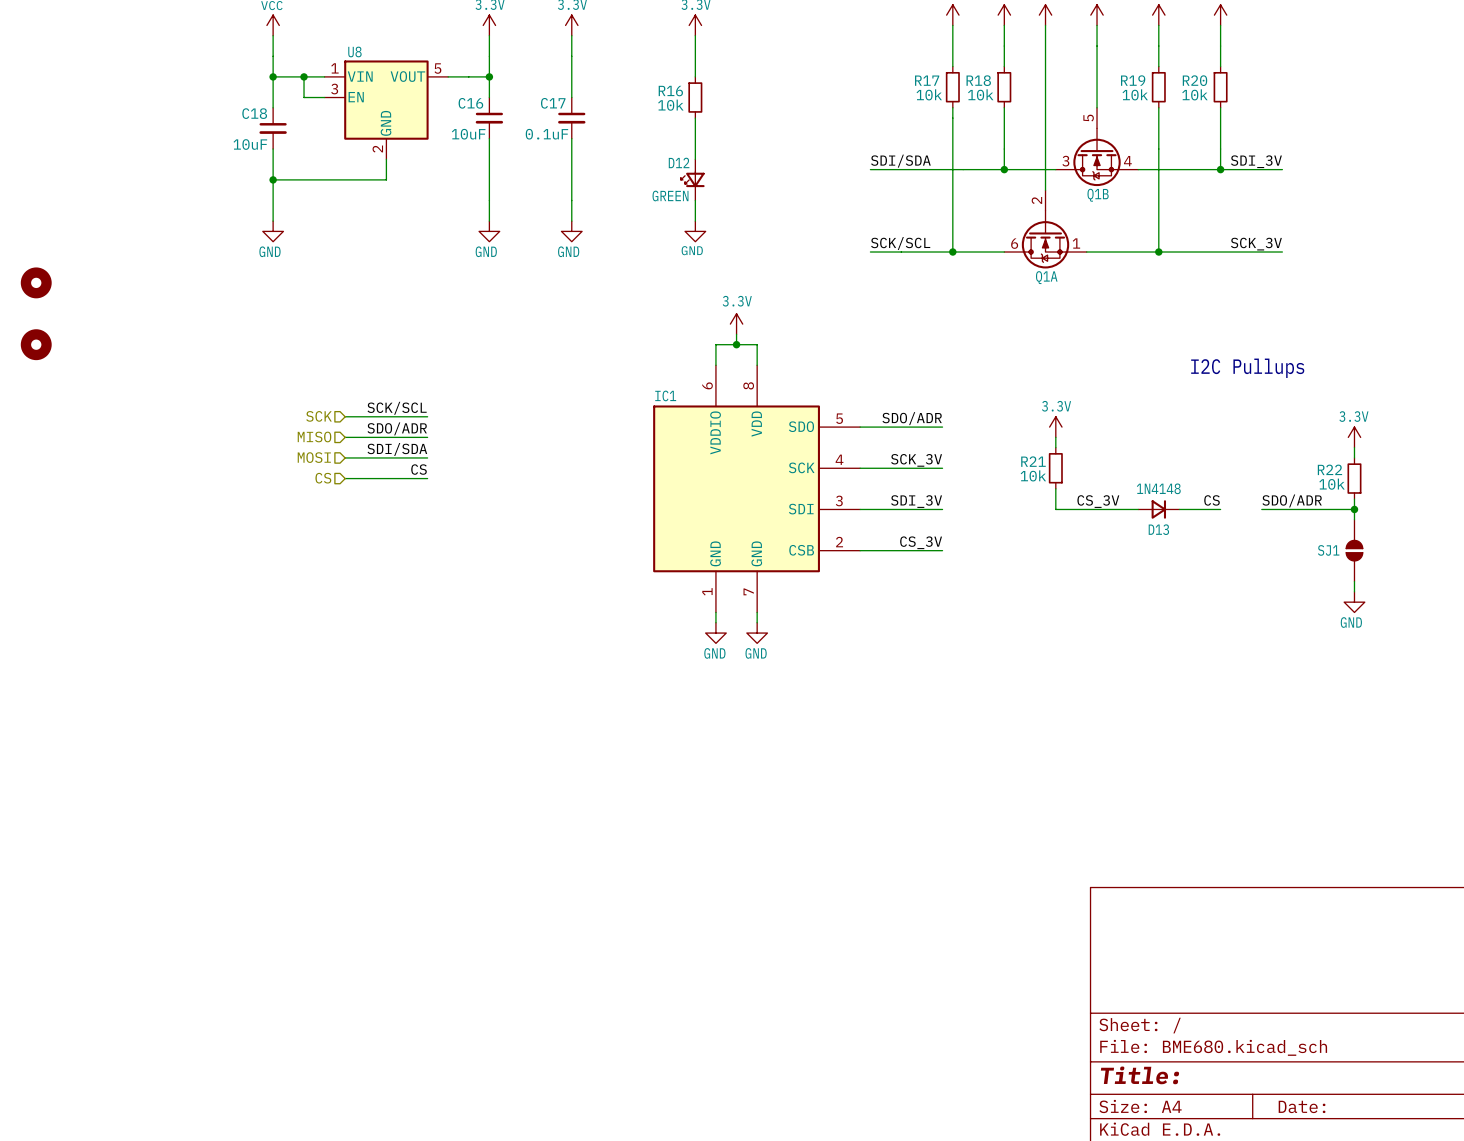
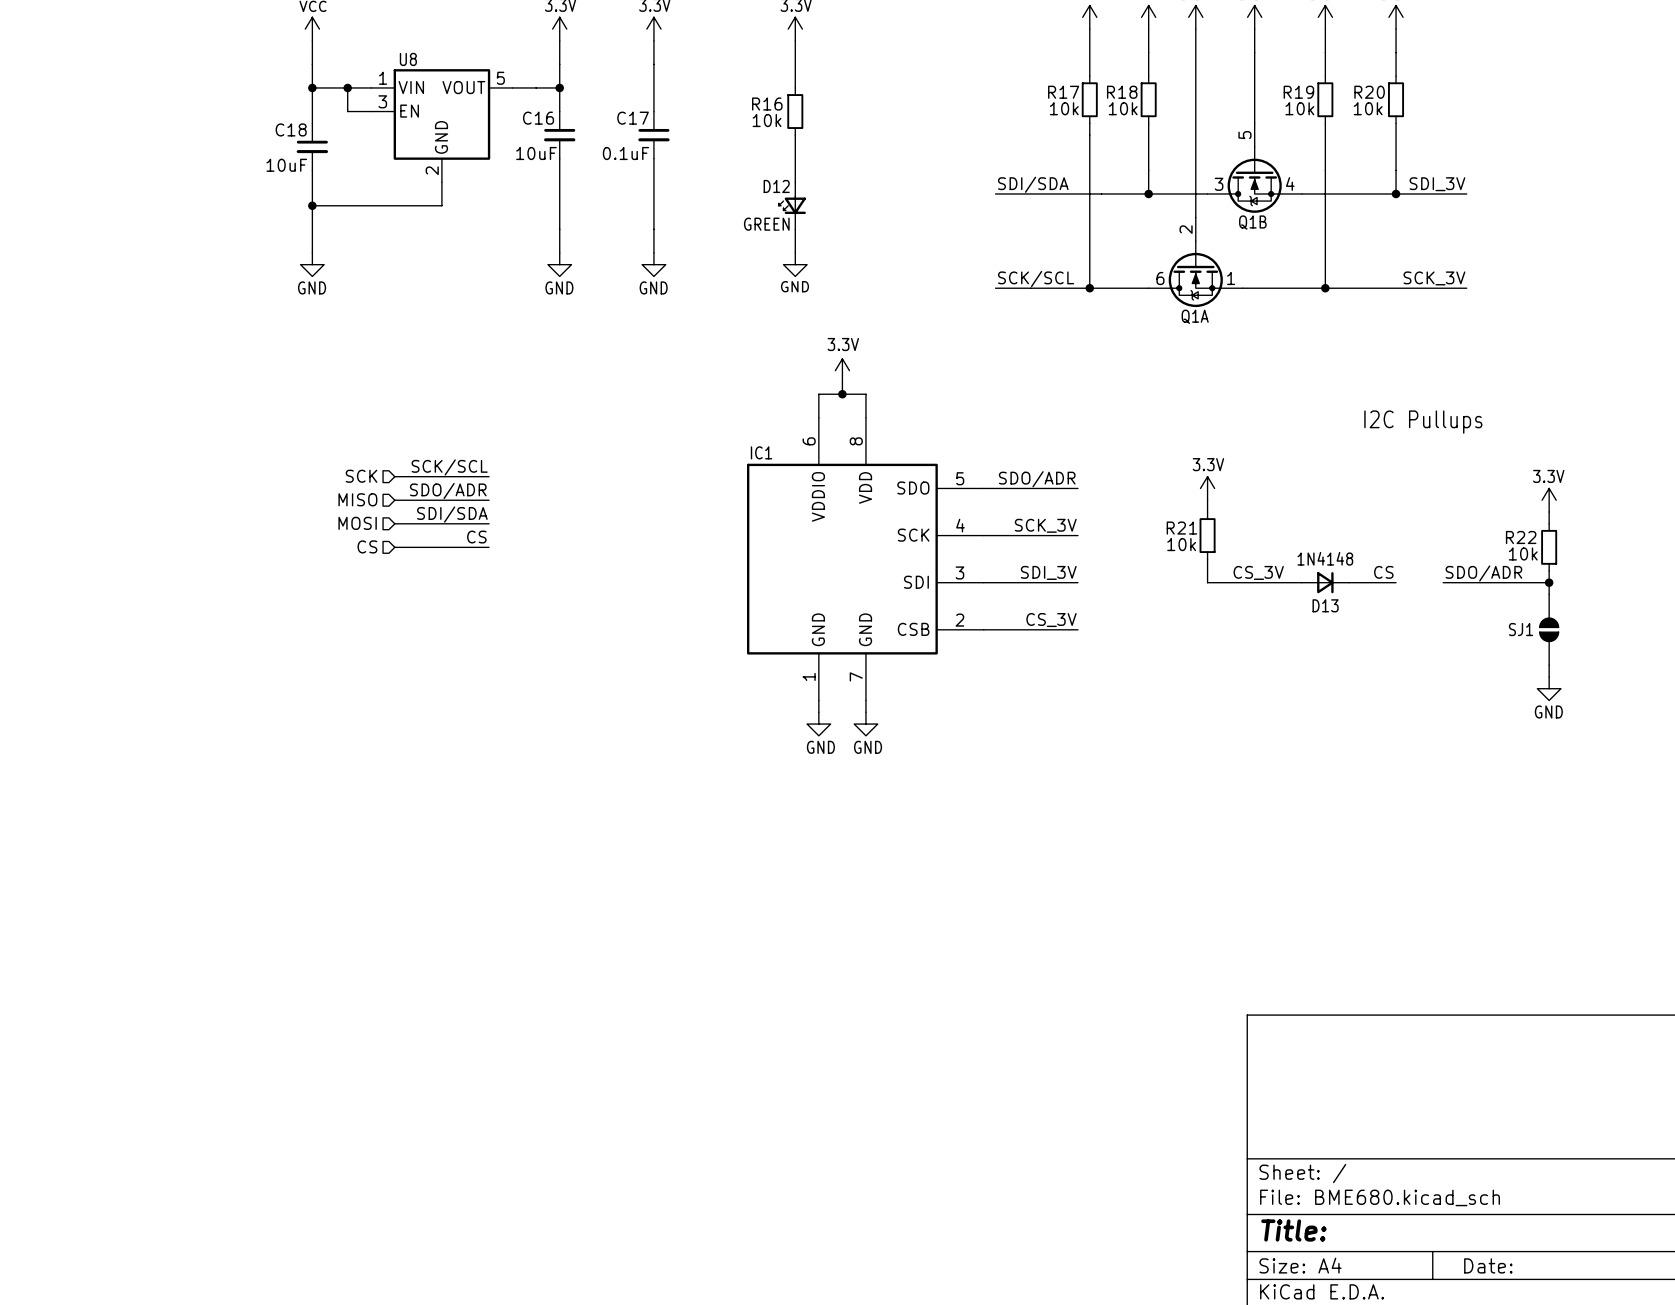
part: (36, 282) -> none
part: (36, 344) -> none

